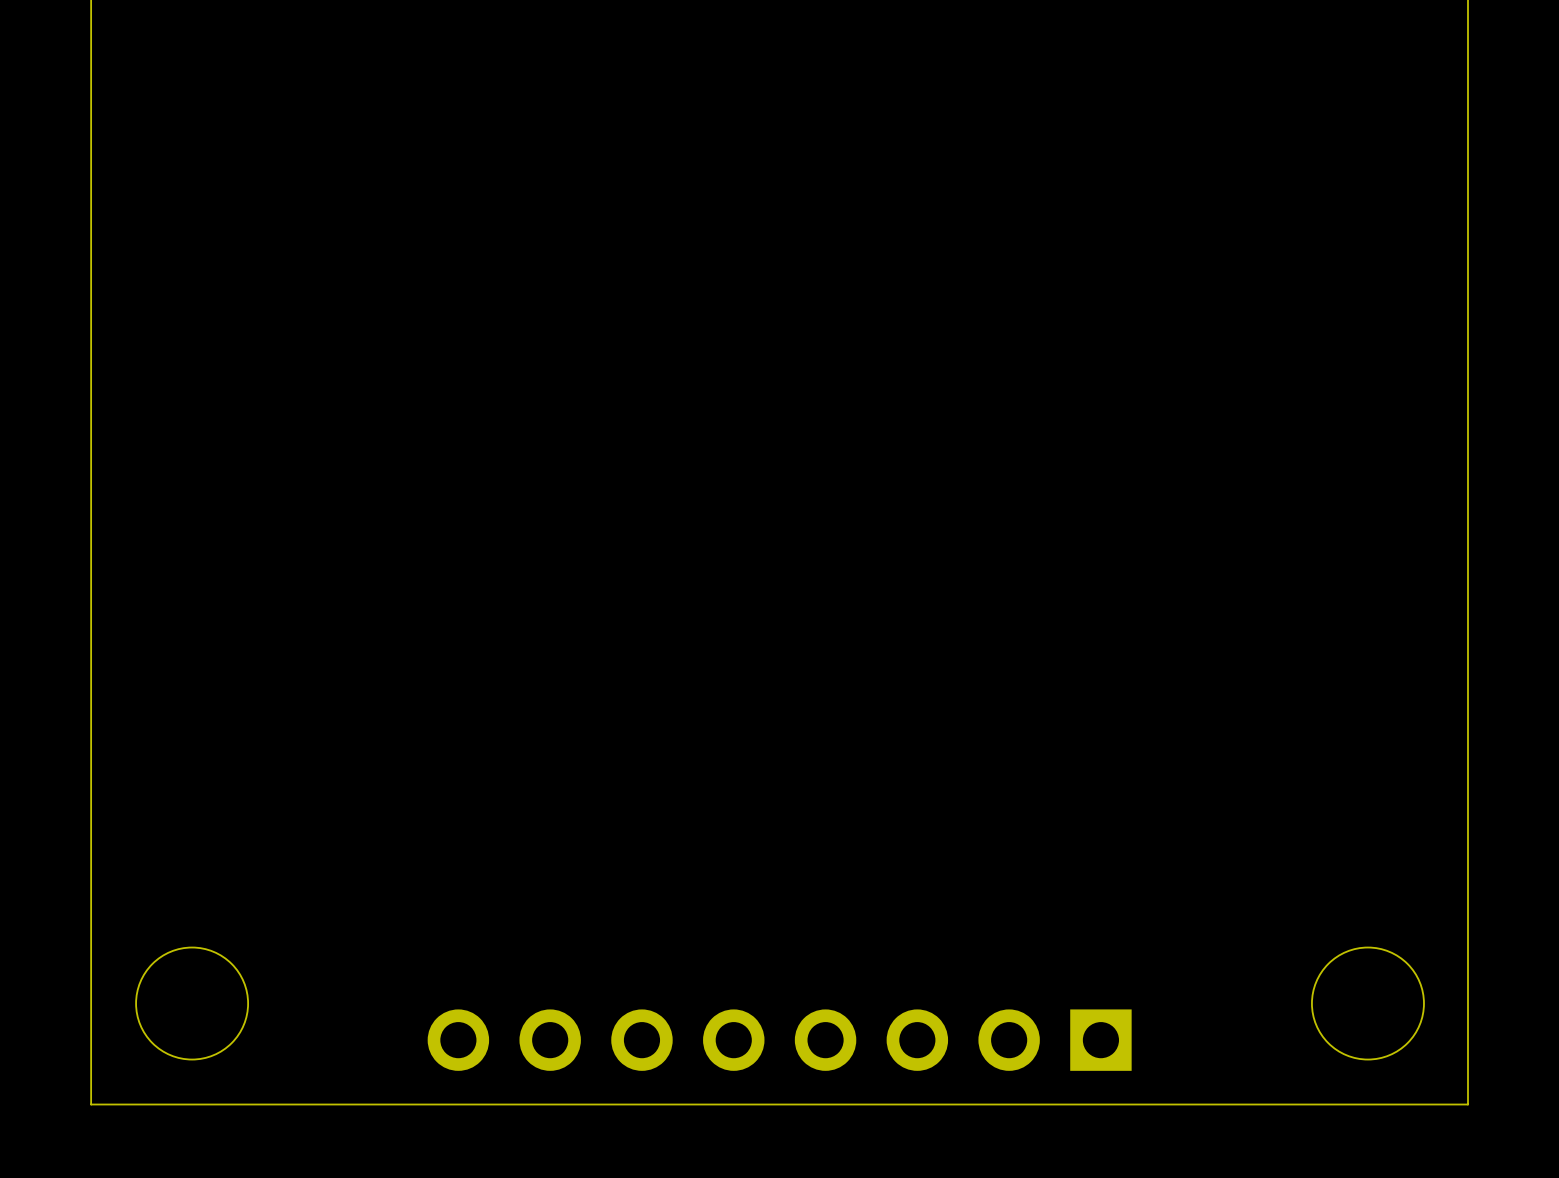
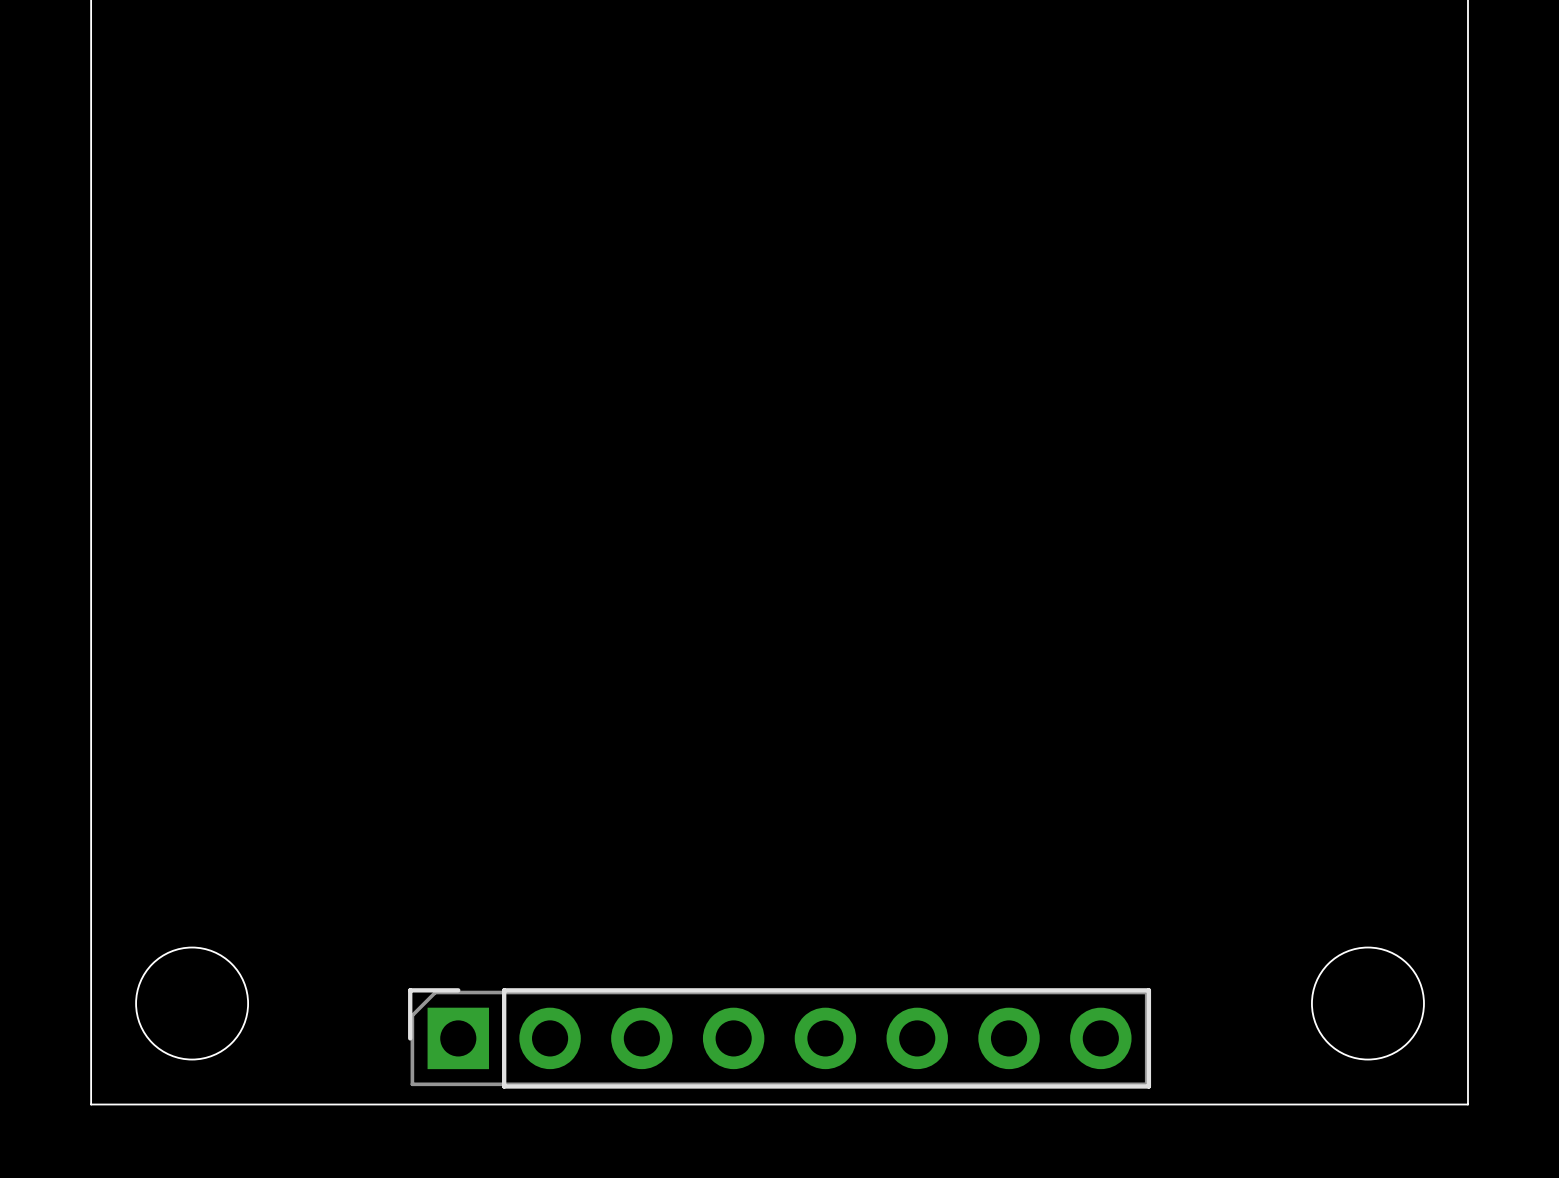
part side: top (779, 1040) -> bottom (779, 1038)

